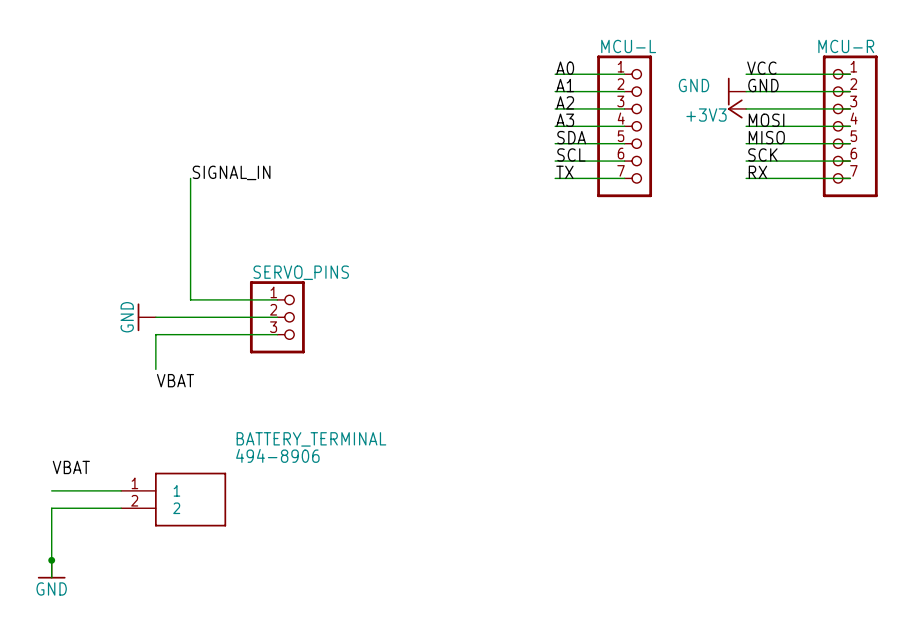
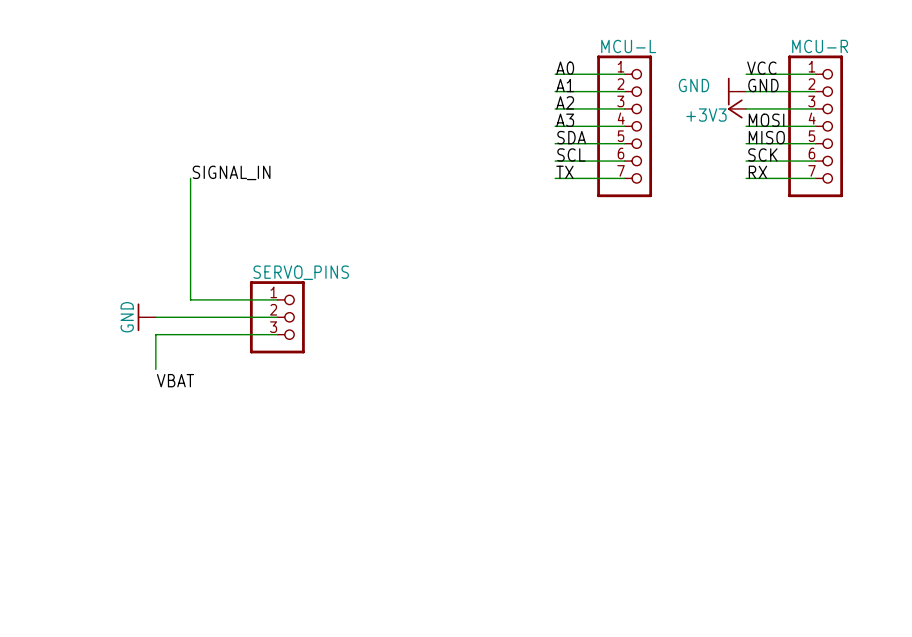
wire: (815, 74) (850, 74) -> none
wire: (815, 91) (850, 91) -> none
wire: (815, 108) (850, 108) -> none
wire: (815, 126) (850, 126) -> none
MCU-R: none -> (815, 126)
MCU-R: (850, 126) -> none
wire: (815, 143) (850, 143) -> none
wire: (815, 161) (850, 161) -> none
wire: (815, 178) (850, 178) -> none
label: VBAT (71, 467) -> none
wire: (51, 490) (121, 490) -> none
BATTERY_TERMINAL: 494-8906 (173, 499) -> none
wire: (121, 508) (51, 508) (51, 577) -> none
junction: (51, 560) -> none
power symbol: GND (51, 569) -> none

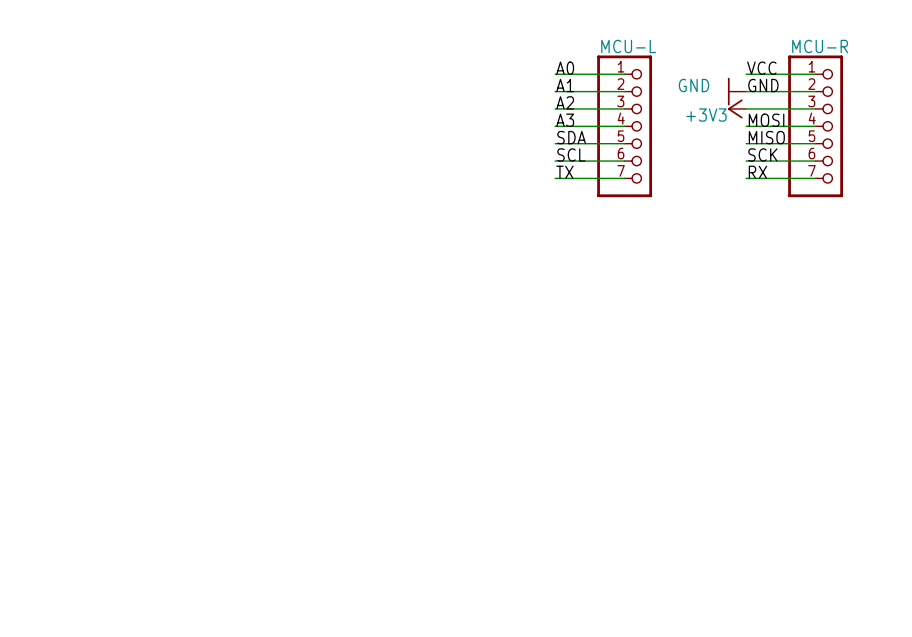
label: SIGNAL_IN (231, 172) -> none
wire: (190, 178) (190, 299) (277, 299) -> none
power symbol: GND (146, 317) -> none
wire: (155, 317) (277, 317) -> none
SERVO_PINS: (277, 317) -> none
wire: (277, 334) (155, 334) (155, 369) -> none
label: VBAT (175, 380) -> none

